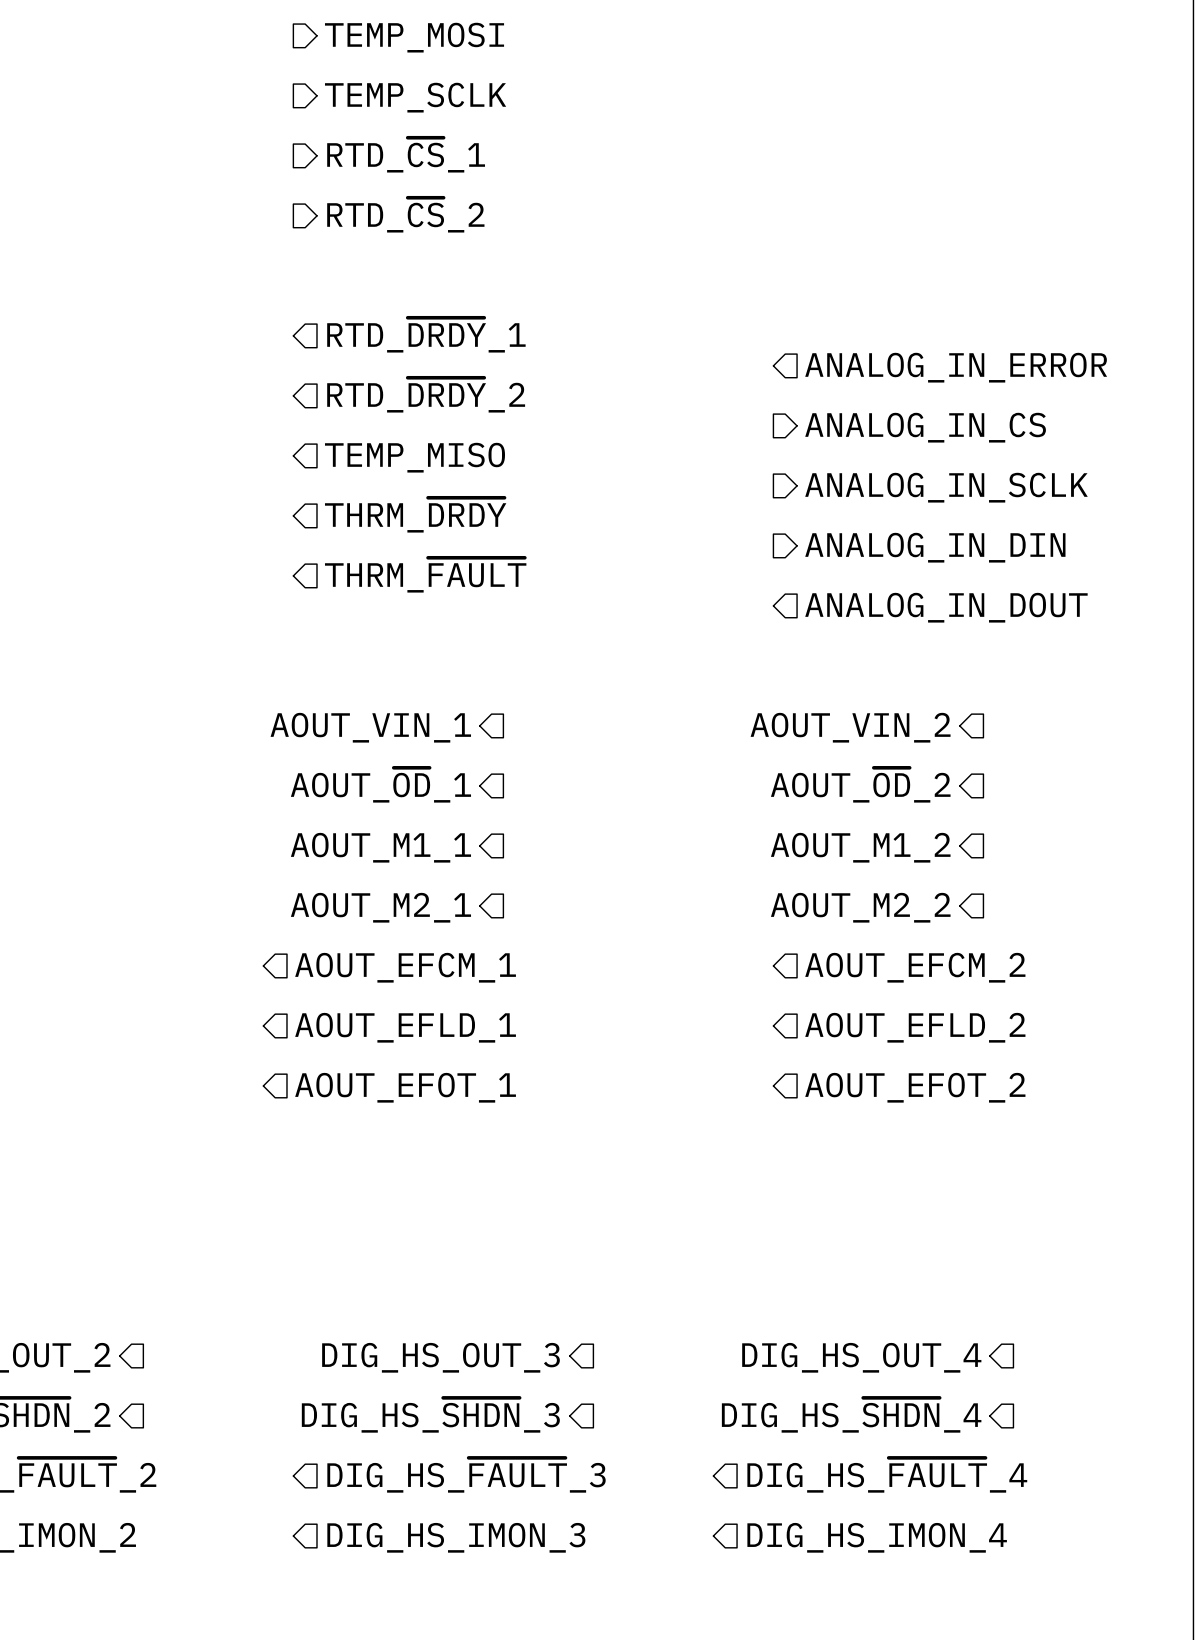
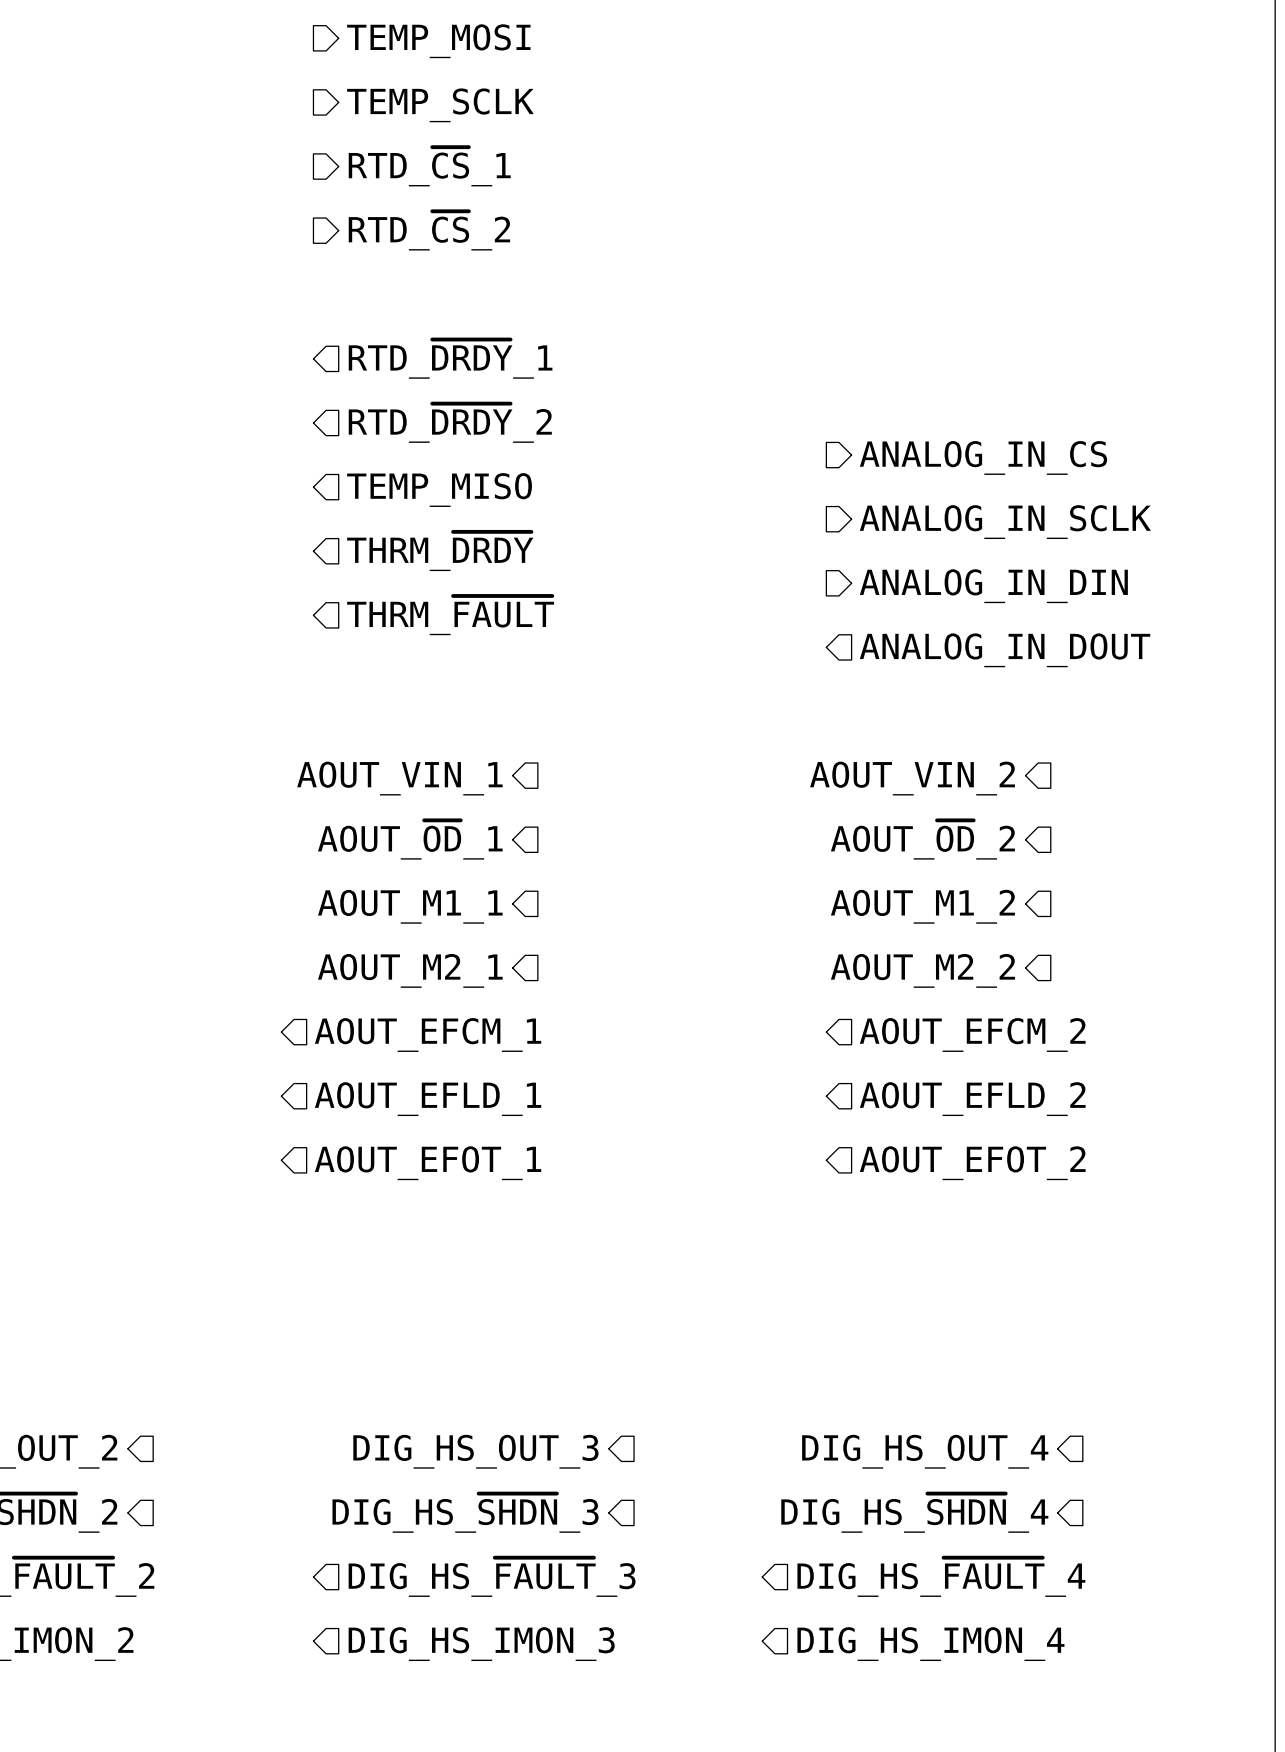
hierarchical label: ANALOG_IN_ERROR (956, 367) -> none

